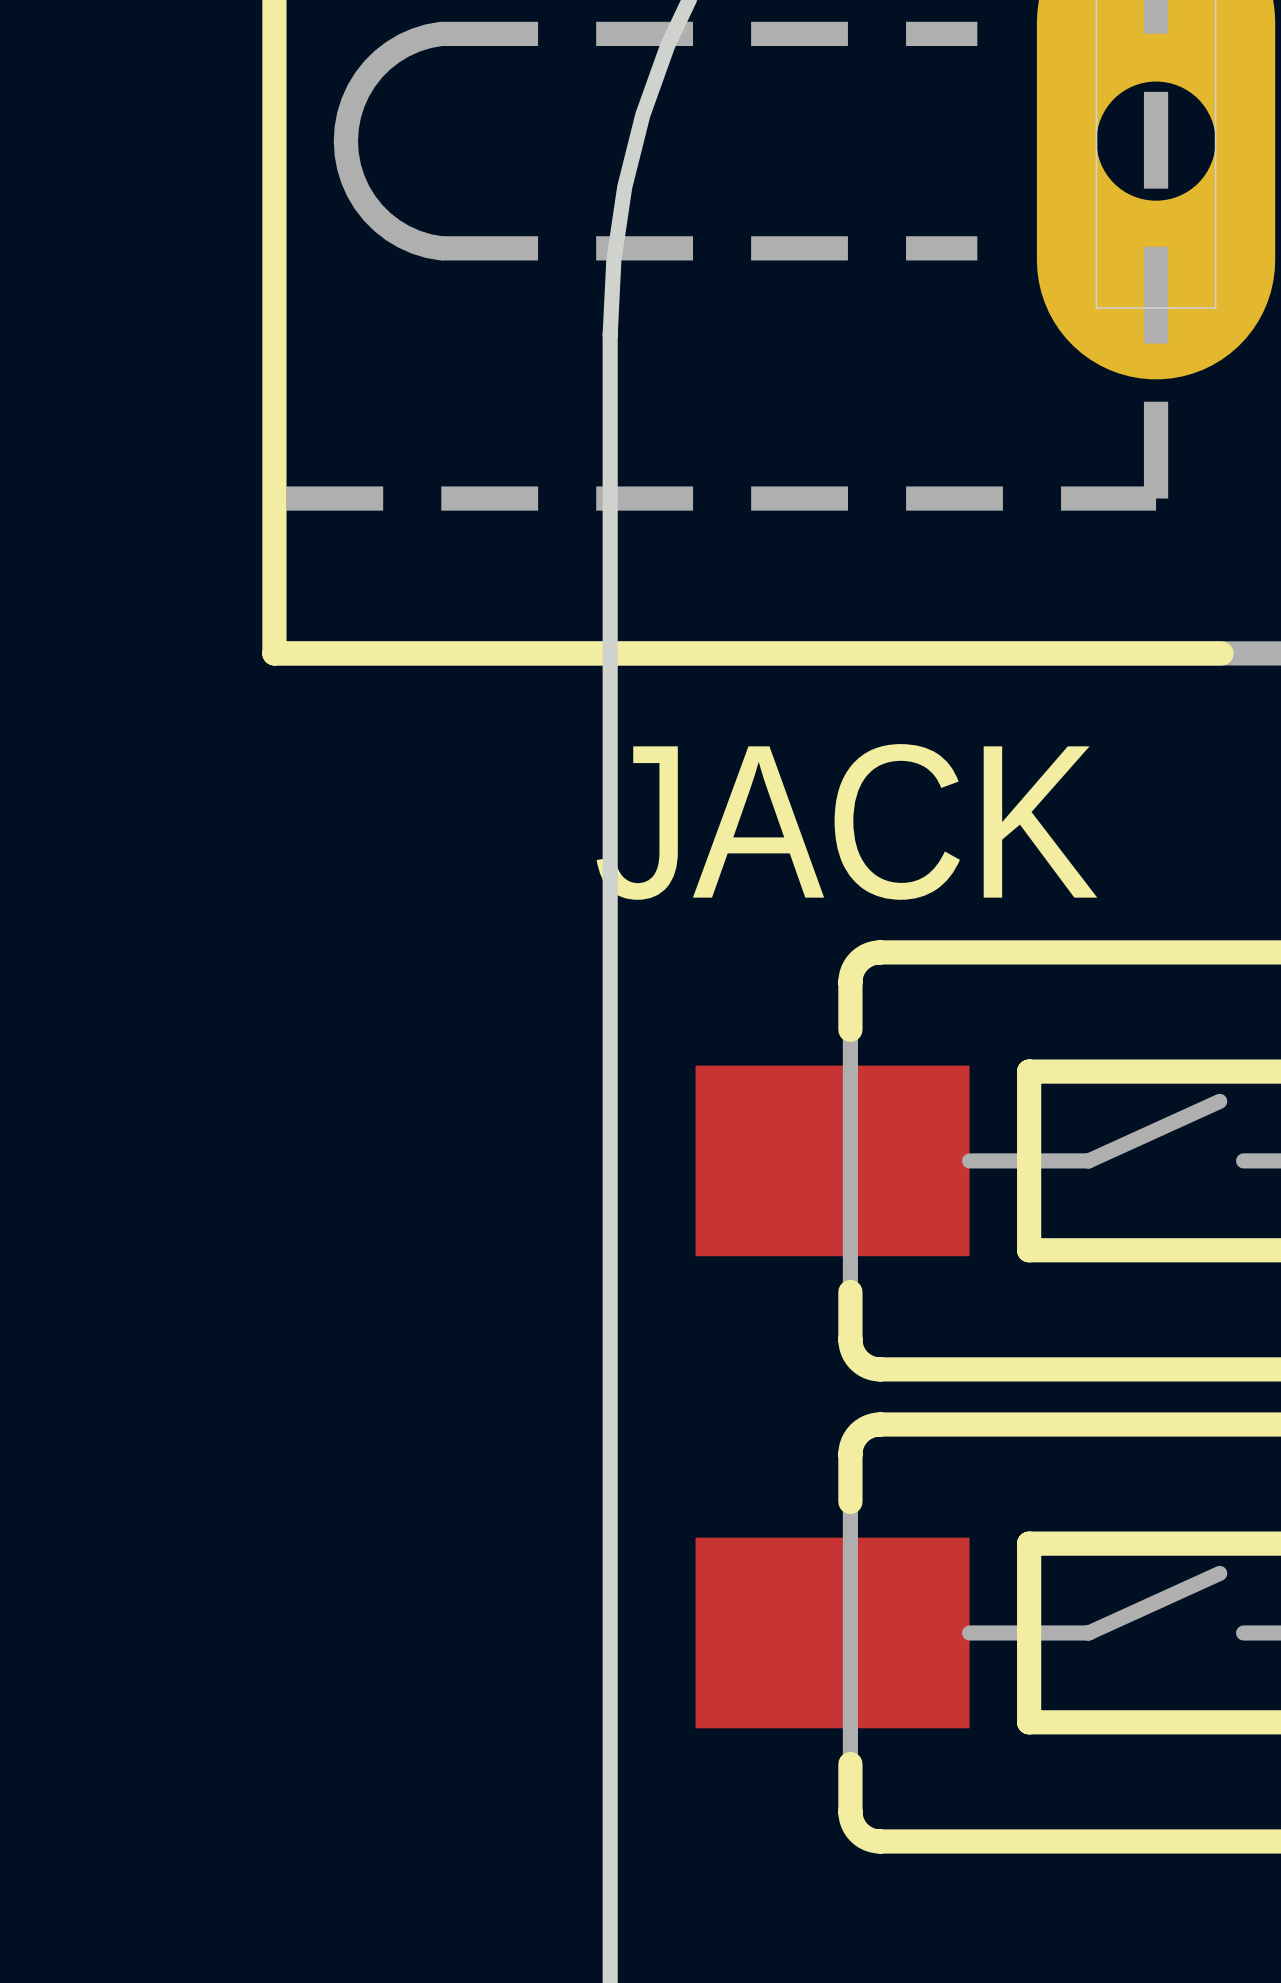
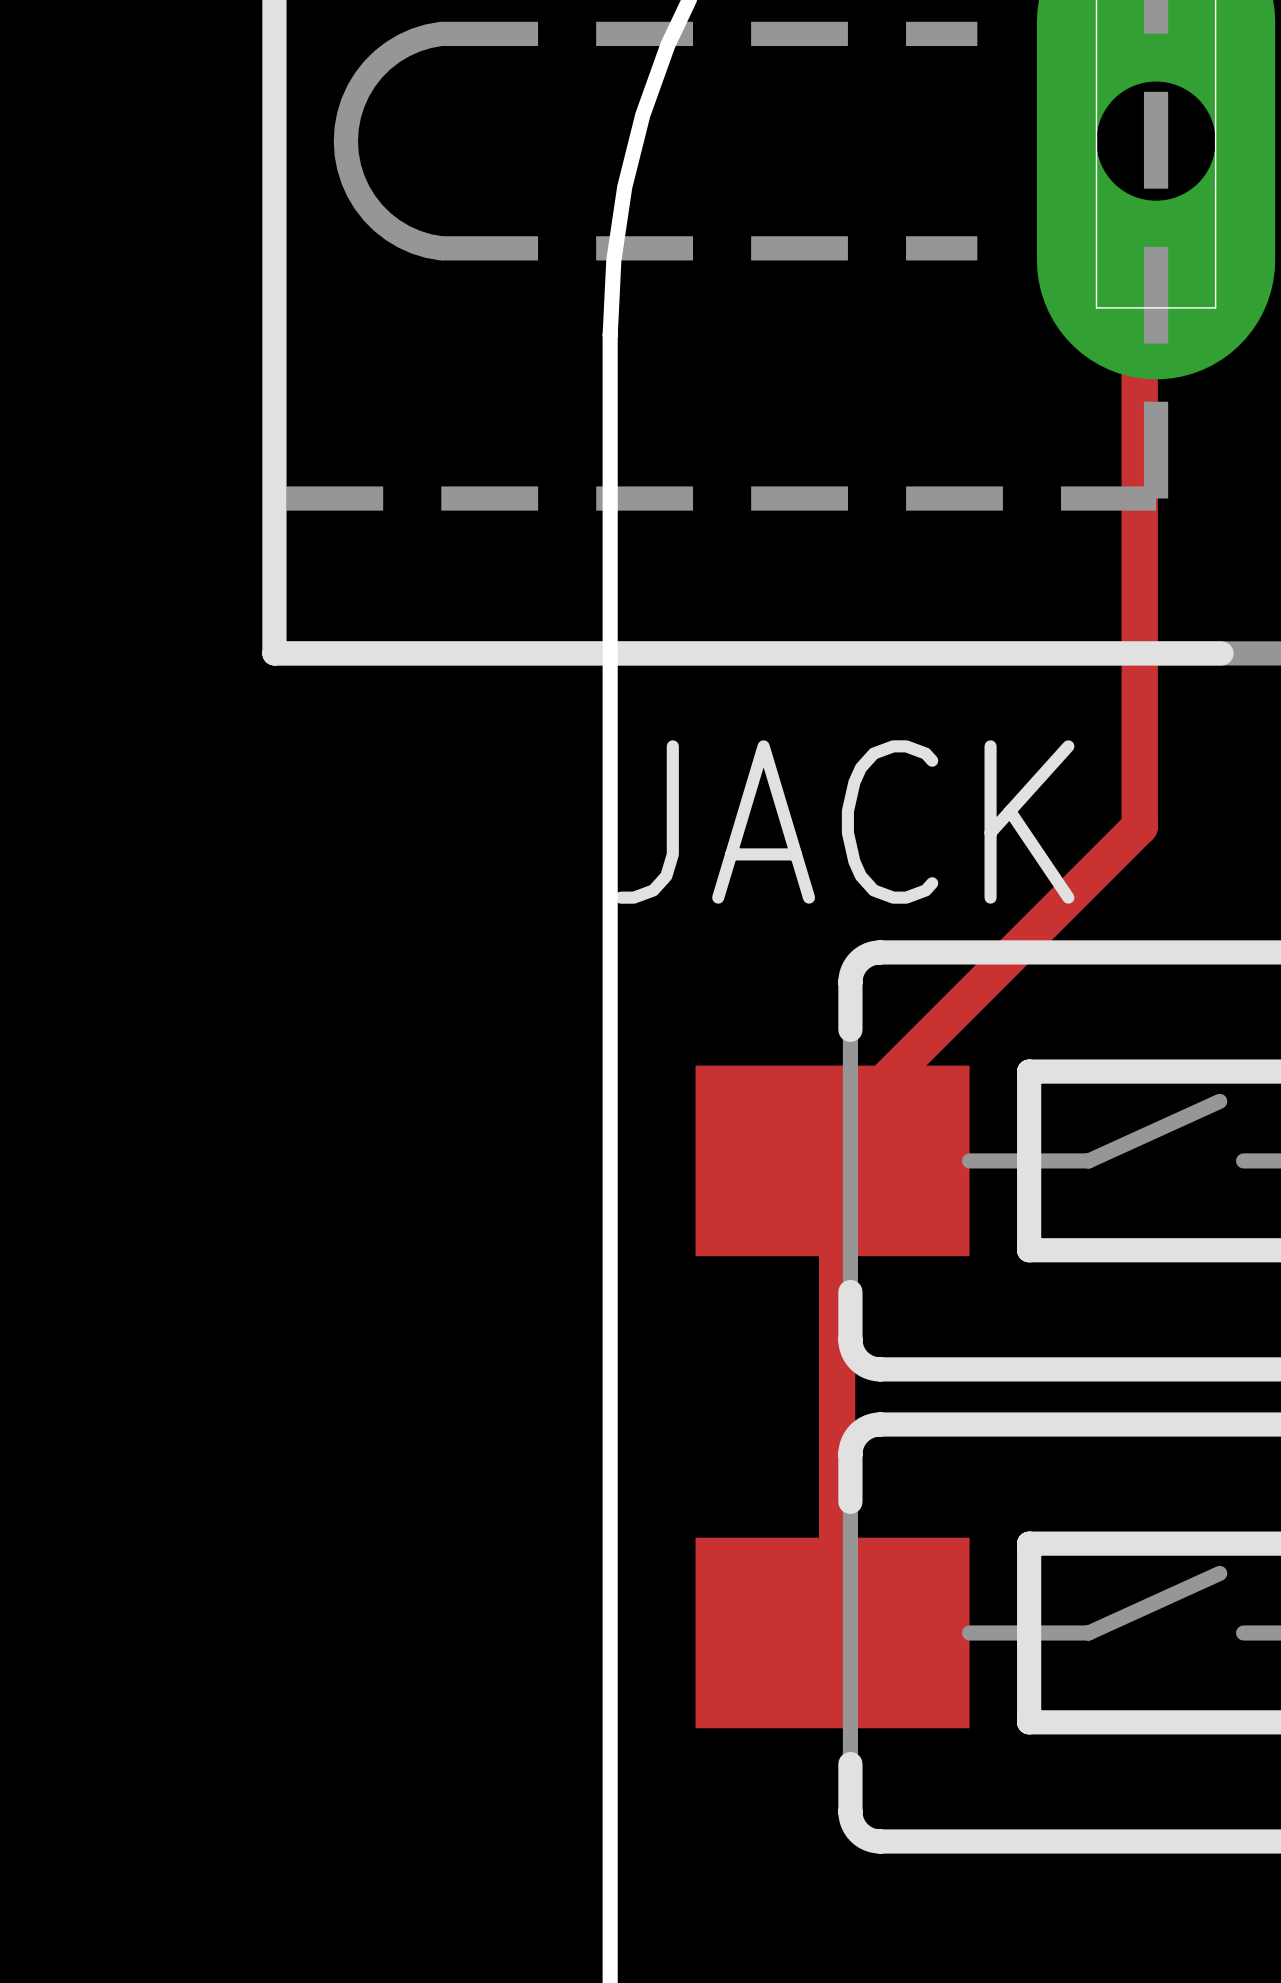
track: none -> (1156, 141) (1139, 145) (1139, 826) (837, 1129) (832, 1160) (837, 1166) (837, 1629) (832, 1632)

